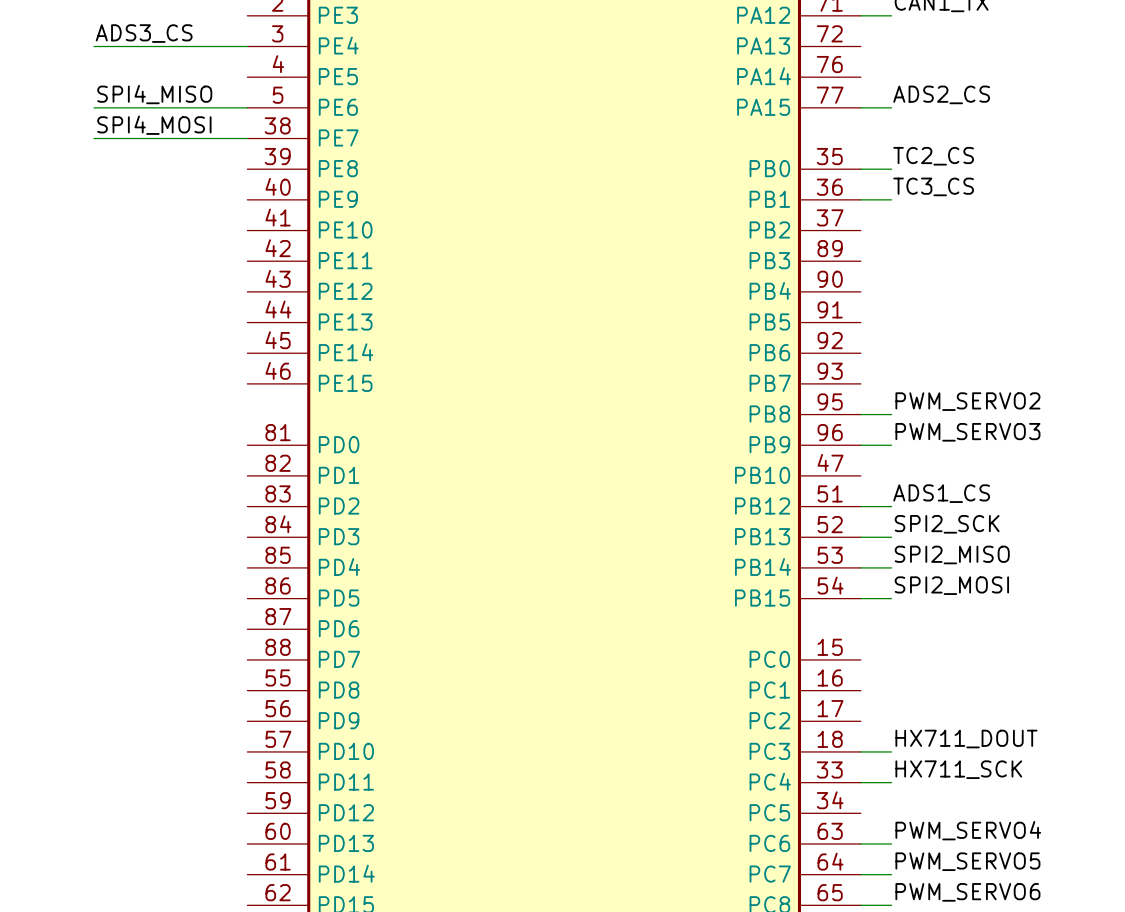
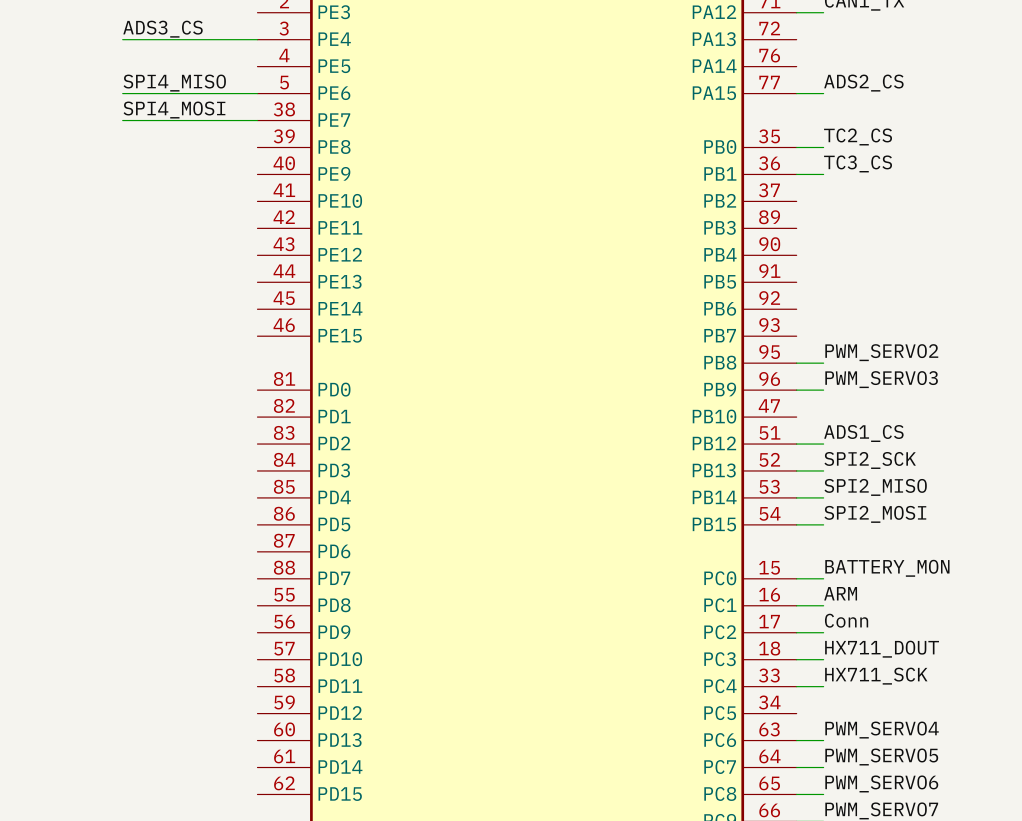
label: none -> BATTERY_MON (887, 568)
wire: none -> (796, 578) (823, 578)
label: none -> ARM (840, 593)
wire: none -> (796, 605) (823, 605)
label: none -> Conn (846, 620)
wire: none -> (796, 632) (823, 632)

